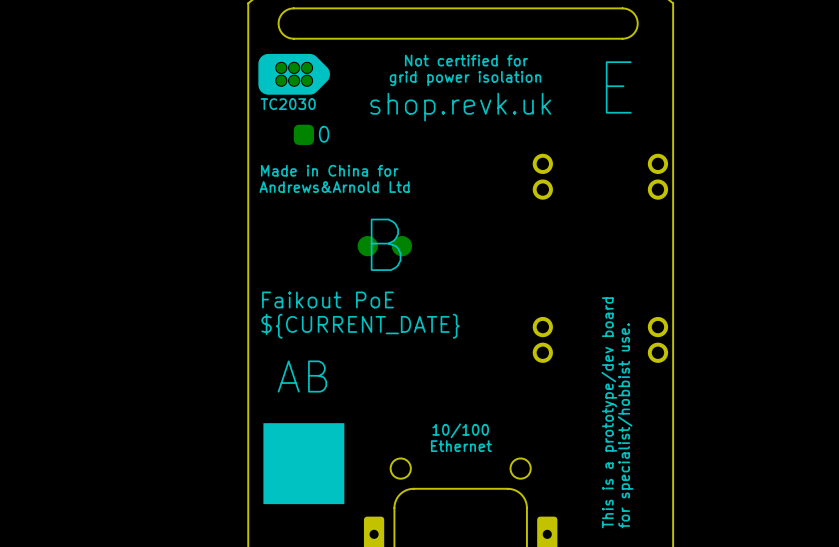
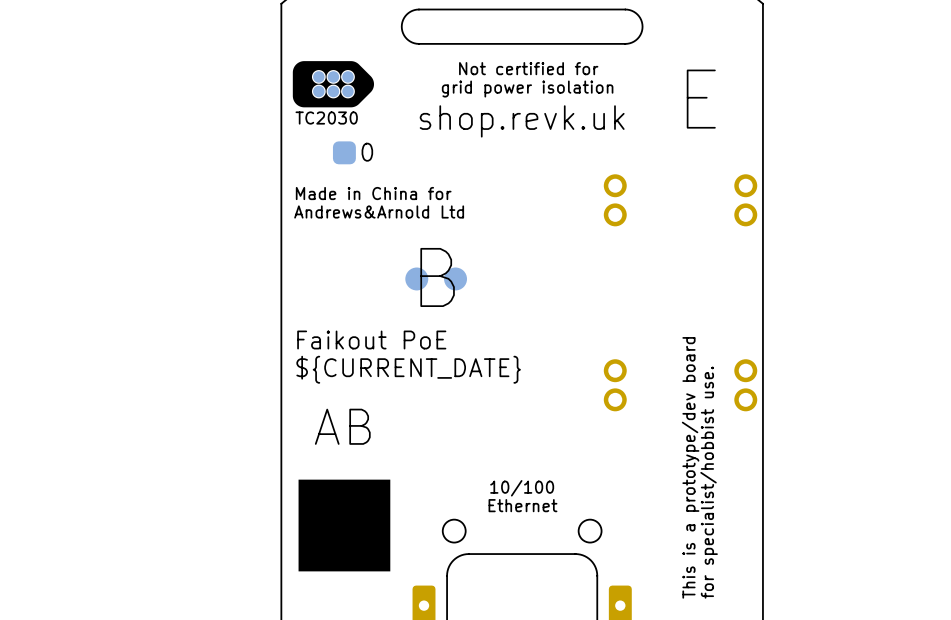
board edge: (369, 8) (291, 8) (283, 12) (278, 23) (283, 34) (291, 38) (369, 38) -> (418, 9) (406, 14) (401, 26) (406, 38) (418, 43)
board edge: (551, 8) (624, 8) (634, 14) (637, 23) (634, 32) (624, 38) (551, 38) -> (625, 9) (637, 14) (642, 26) (637, 38) (625, 43)

